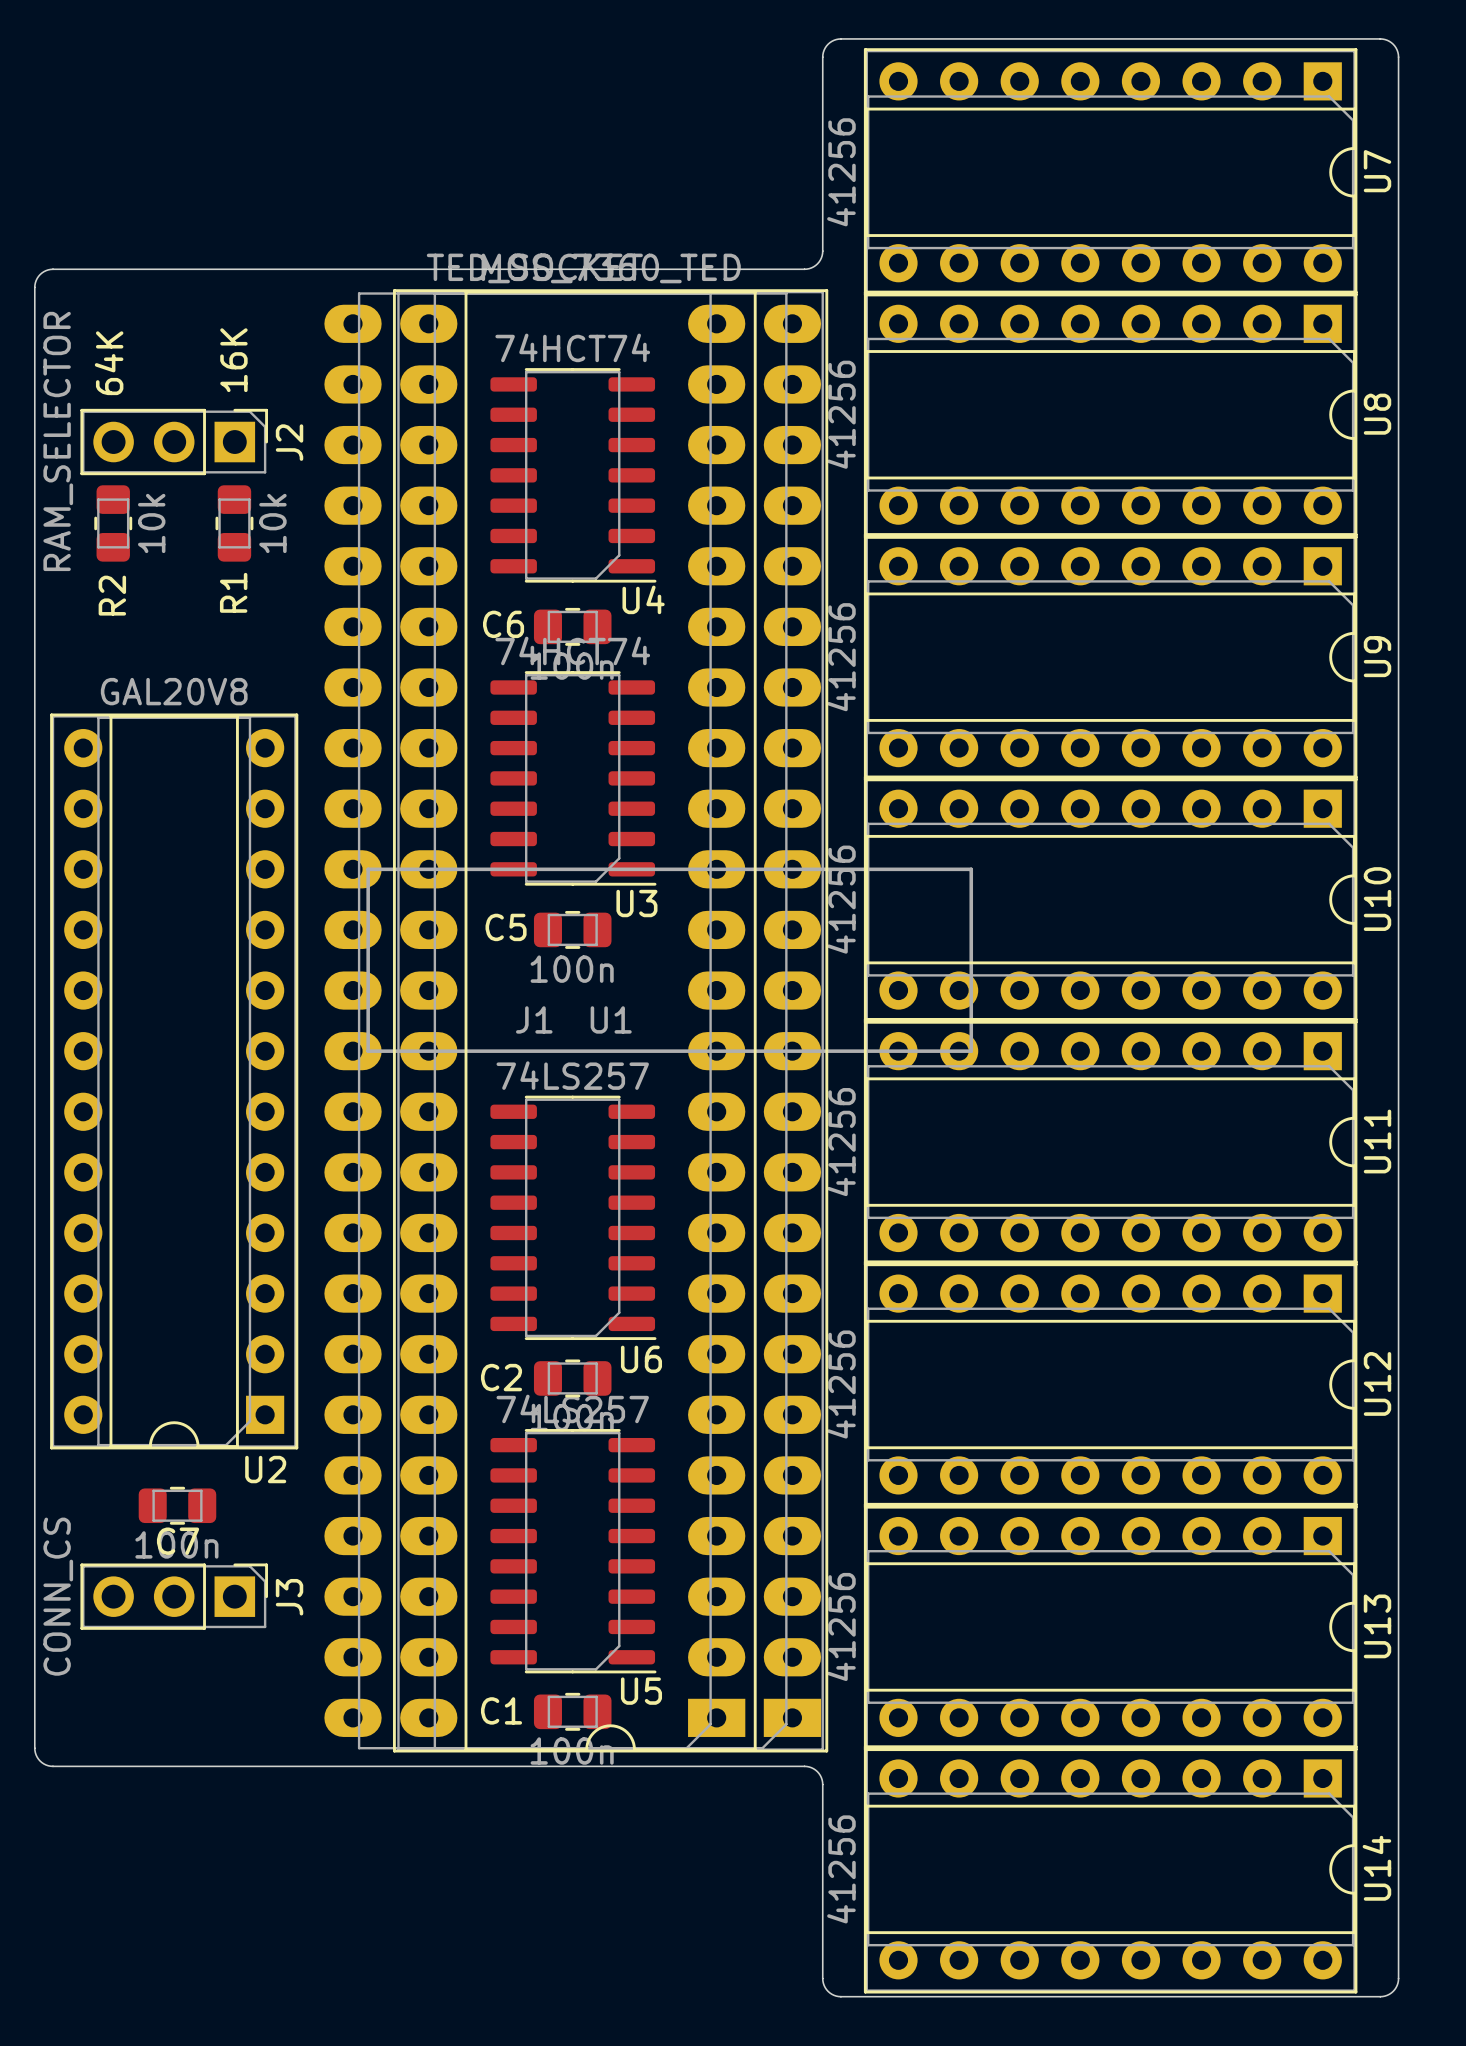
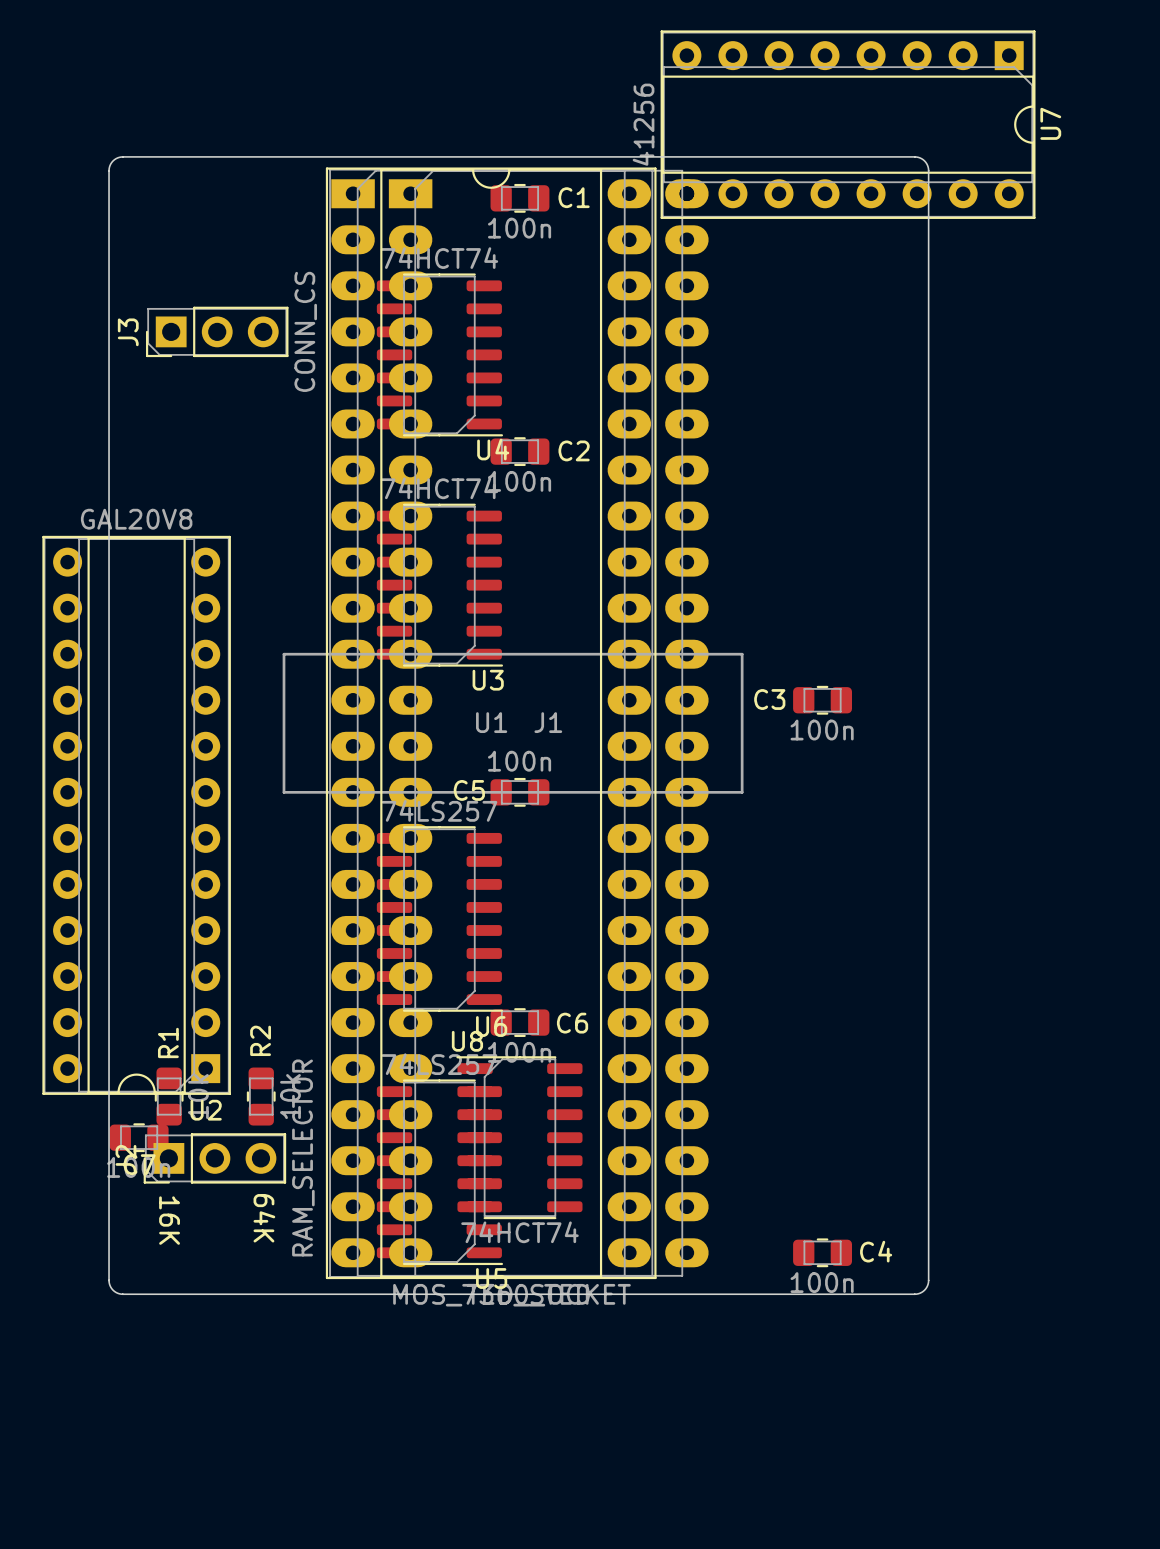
board edge: (840, 38) (1380, 38) (1391, 42) (1397, 52) (1398, 1978) (1394, 1989) (1385, 1996) (833, 1995) (826, 1989) (822, 1978) (822, 1782) (817, 1771) (806, 1766) (52, 1766) (41, 1762) (35, 1752) (36, 280) (41, 273) (52, 269) (809, 268) (818, 262) (822, 251) (822, 54) (828, 44) (840, 38) -> (122, 156) (113, 160) (109, 170) (109, 1280) (111, 1288) (122, 1294) (914, 1294) (923, 1291) (928, 1280) (928, 170) (925, 162) (914, 156) (122, 156)
U8 footprint: [863, 290, 1358, 539] -> [456, 1056, 583, 1220]
text: 16K (233, 360) -> none
text: 64K (109, 363) -> none
U8 value: 41256 (841, 414) -> 74HCT74 (519, 1232)
U8 name position: U8 (1377, 414) -> U8 (467, 1041)
J2 rotation: 0° (174, 442) -> 180° (214, 1158)
J2 position: (174, 442) -> (214, 1158)
R2 position: (113, 523) -> (261, 1096)
R1 position: (234, 523) -> (169, 1096)
R1 name position: R1 (233, 592) -> R1 (168, 1042)
R2 name position: R2 (112, 595) -> R2 (260, 1040)
C6 name position: C6 (503, 624) -> C6 (572, 1023)
C6 position: (572, 626) -> (519, 1022)
U9: 41256 (1110, 657) -> none
U10: 41256 (1110, 899) -> none
C5 position: (572, 929) -> (519, 792)
C3: none -> 100n (822, 700)
C5 value position: 100n (572, 969) -> 100n (519, 761)
J1 rotation: 0° (534, 1020) -> 180° (548, 723)
U1 rotation: 0° (610, 1020) -> 180° (491, 723)
U11: 41256 (1110, 1142) -> none
C2 name position: C2 (501, 1377) -> C2 (574, 450)
C2 position: (572, 1378) -> (519, 451)
U12: 41256 (1110, 1384) -> none
J3 rotation: 0° (174, 1596) -> 180° (217, 331)
J3 position: (174, 1596) -> (217, 331)
text: none -> 64K (264, 1218)
text: none -> 16K (169, 1220)
U13: 41256 (1110, 1626) -> none
C4: none -> 100n (822, 1252)
C1 name position: C1 (501, 1710) -> C1 (574, 197)
C1 position: (572, 1711) -> (519, 198)
U14: 41256 (1110, 1869) -> none

